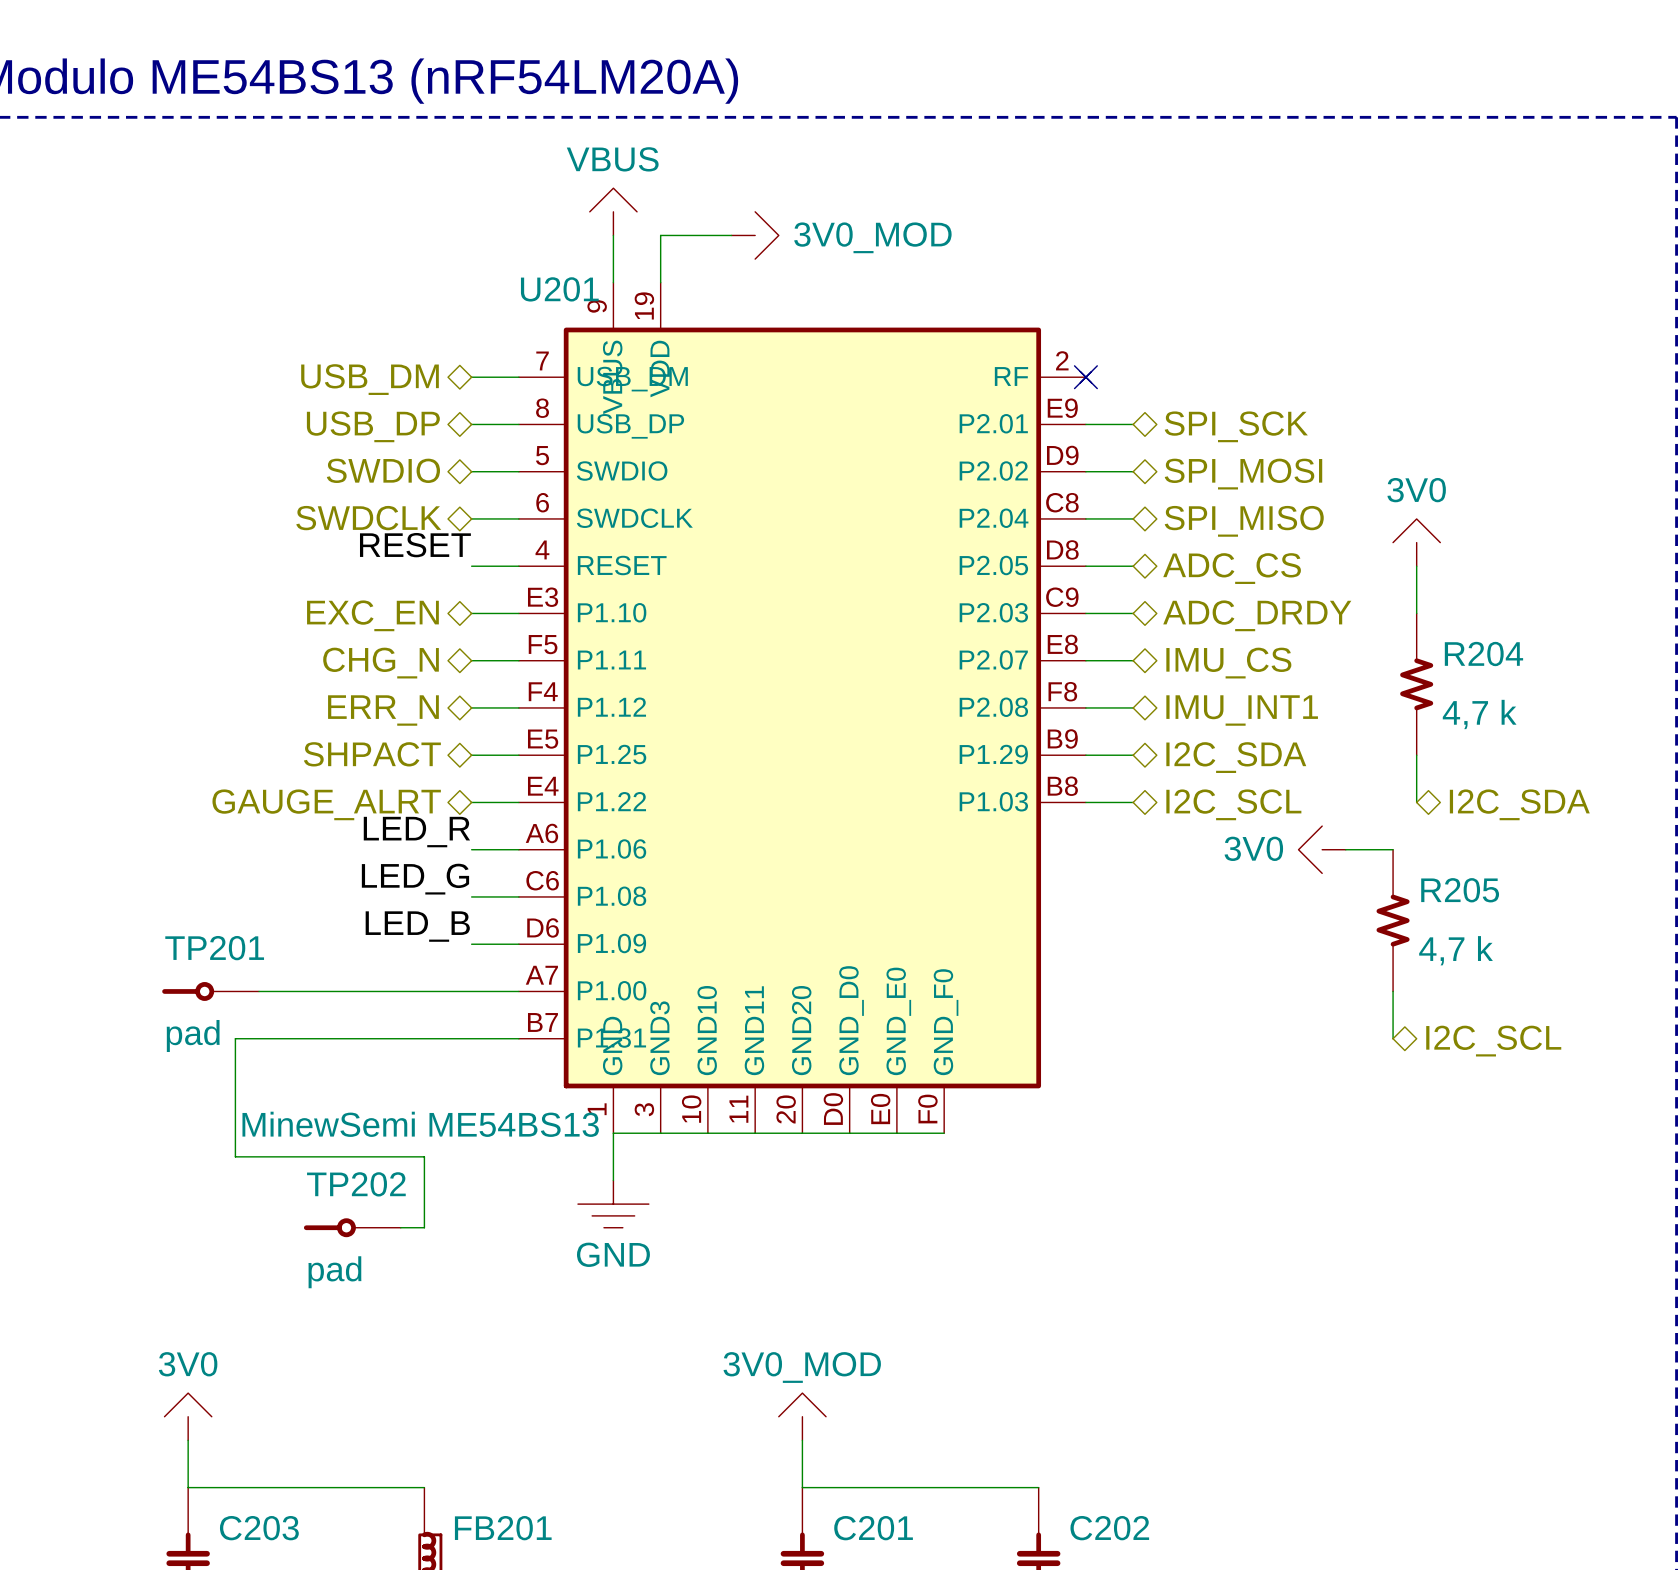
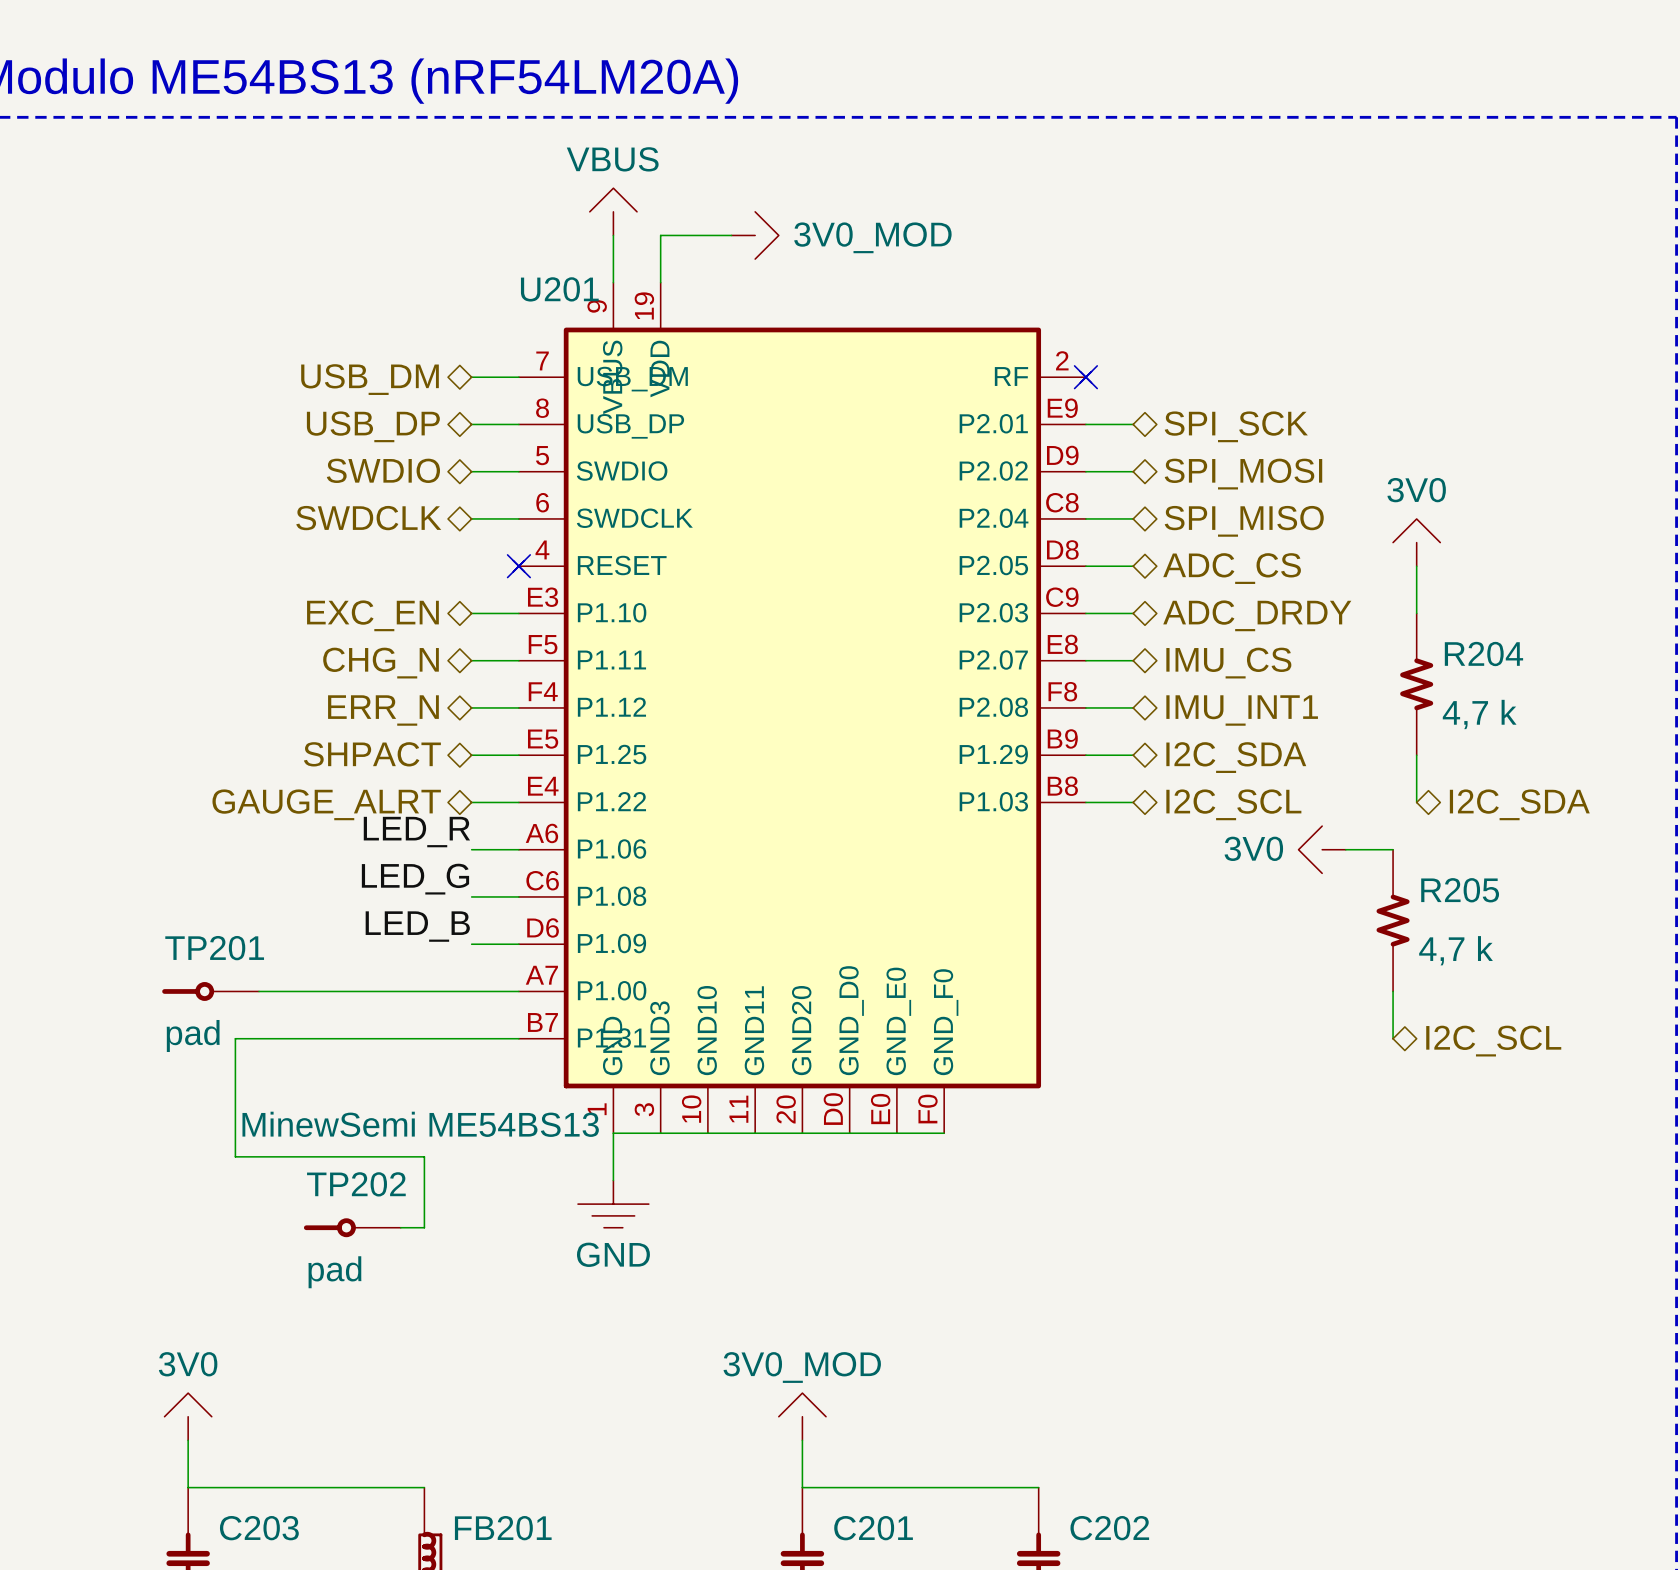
U201 symbol: [518, 282, 1092, 1134] -> [513, 282, 1092, 1134]
label: RESET (415, 545) -> none
wire: (471, 566) (518, 566) -> none
no-connect mark: none -> (518, 566)

